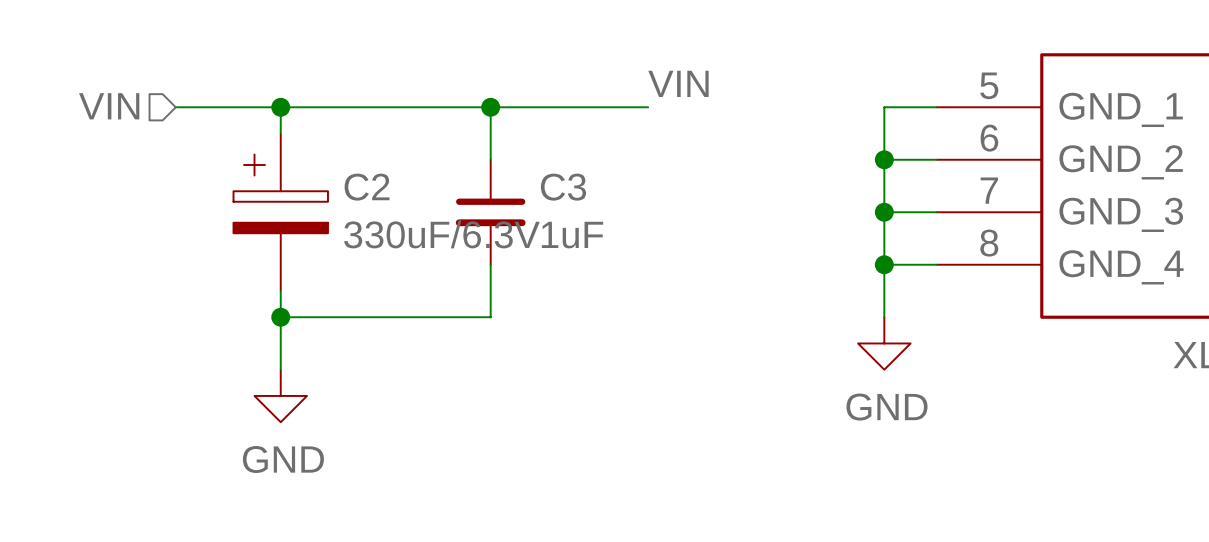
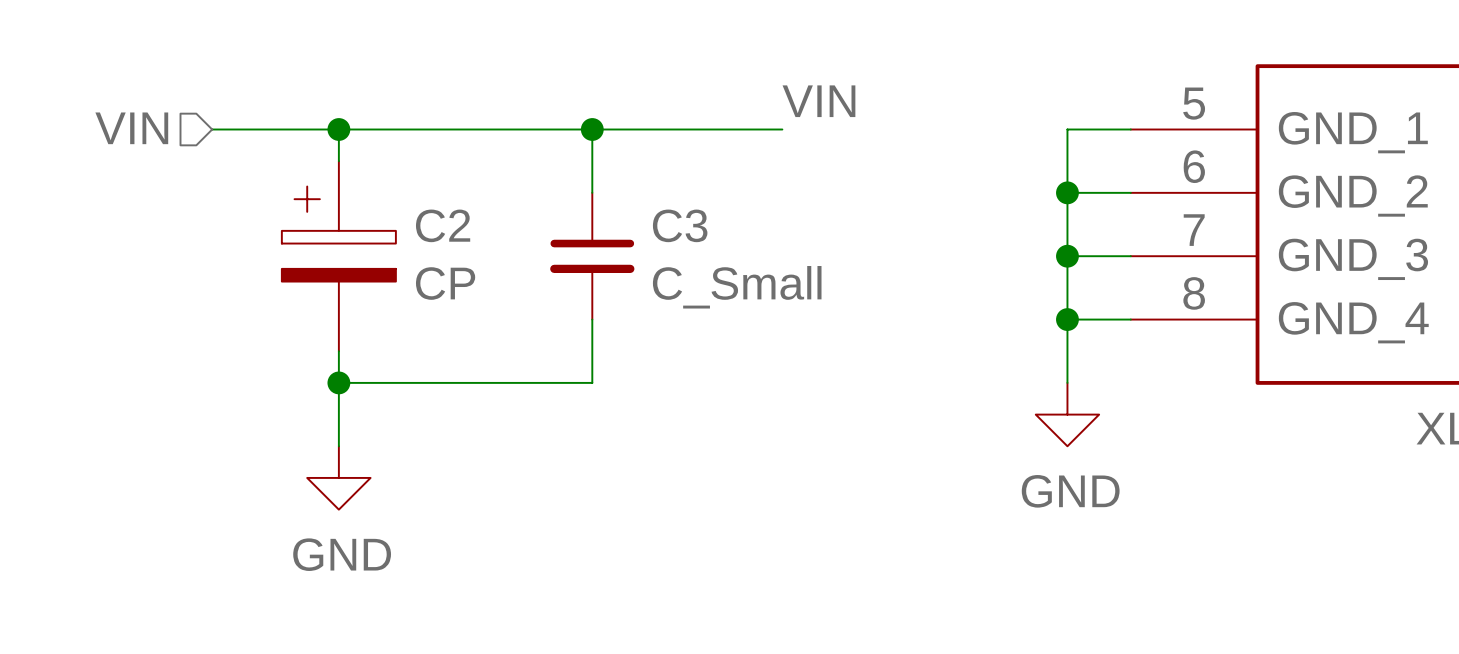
C2 value: 330uF/6.3V (441, 234) -> CP (445, 283)
C3 value: 1uF (572, 235) -> C_Small (737, 287)

